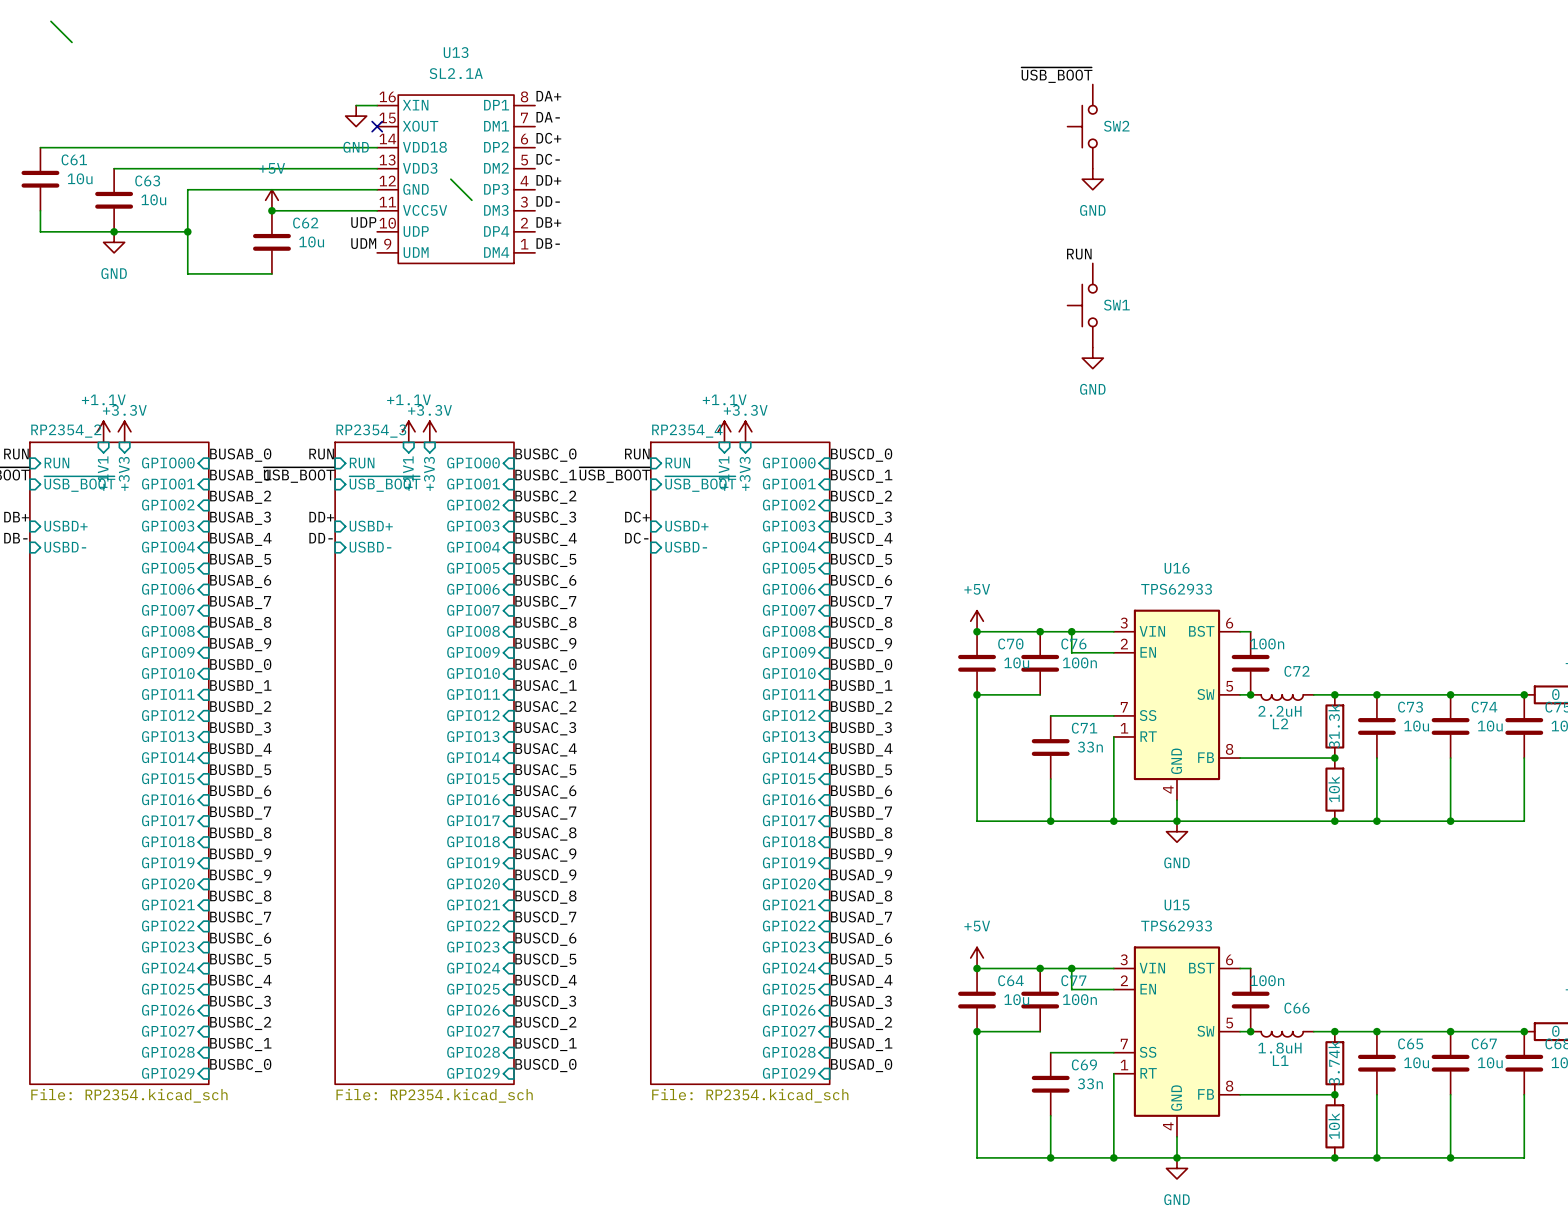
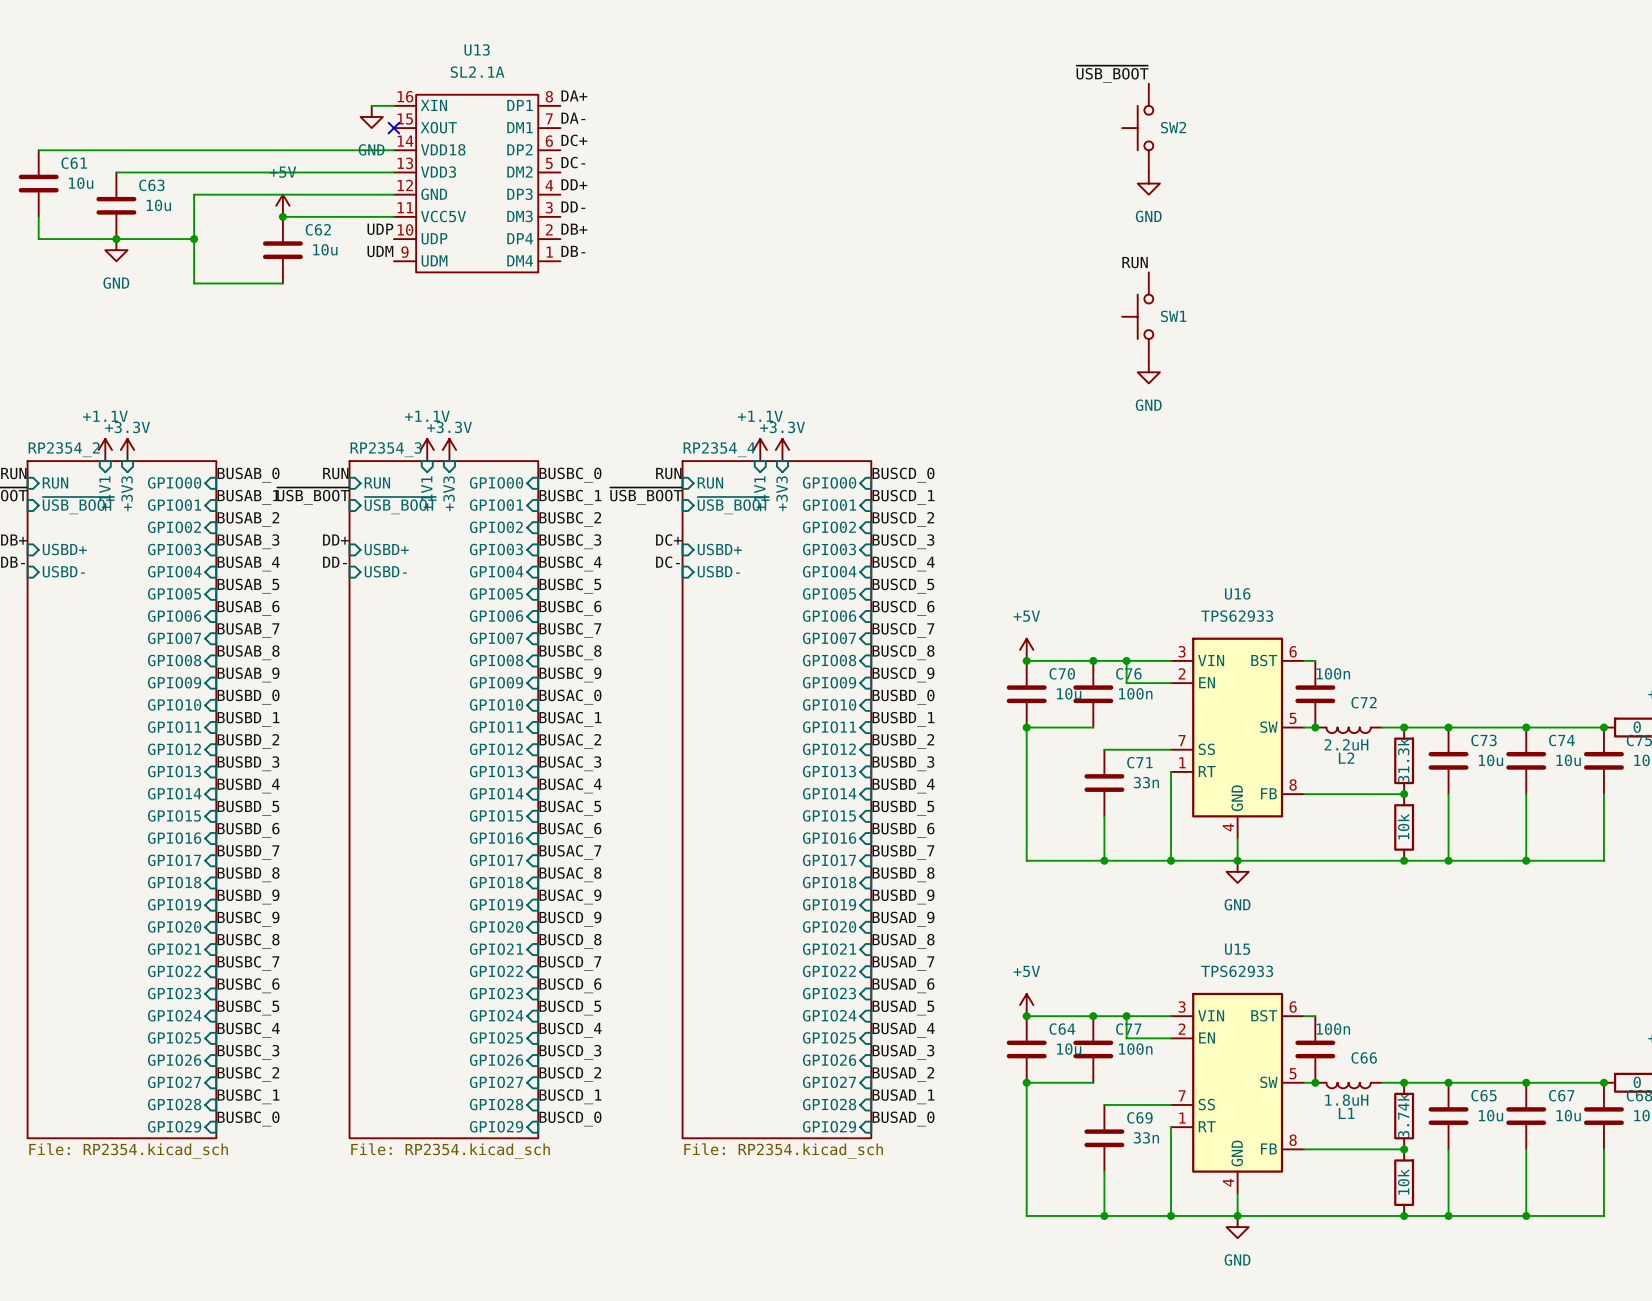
wire: (50, 21) (72, 42) -> none
wire: (450, 179) (471, 200) -> none

